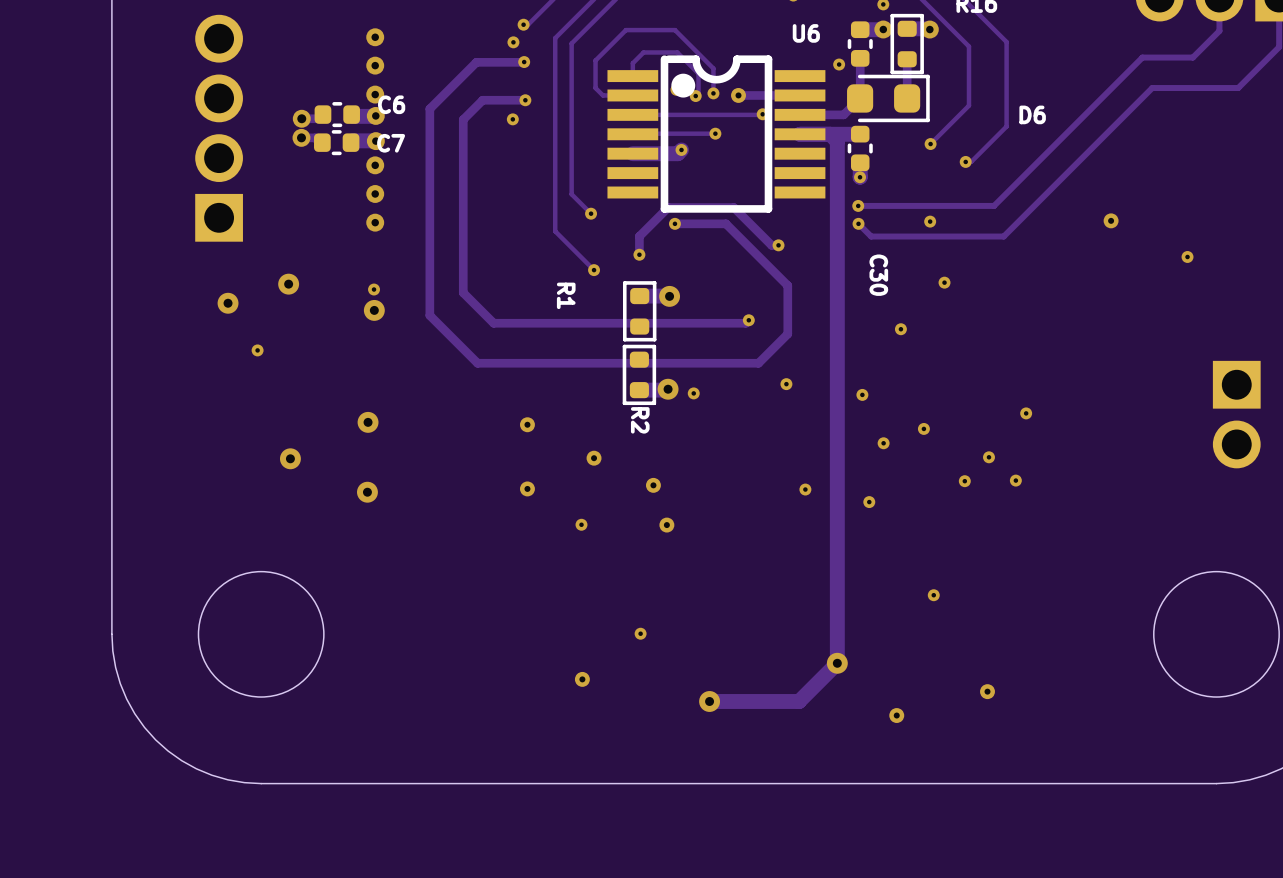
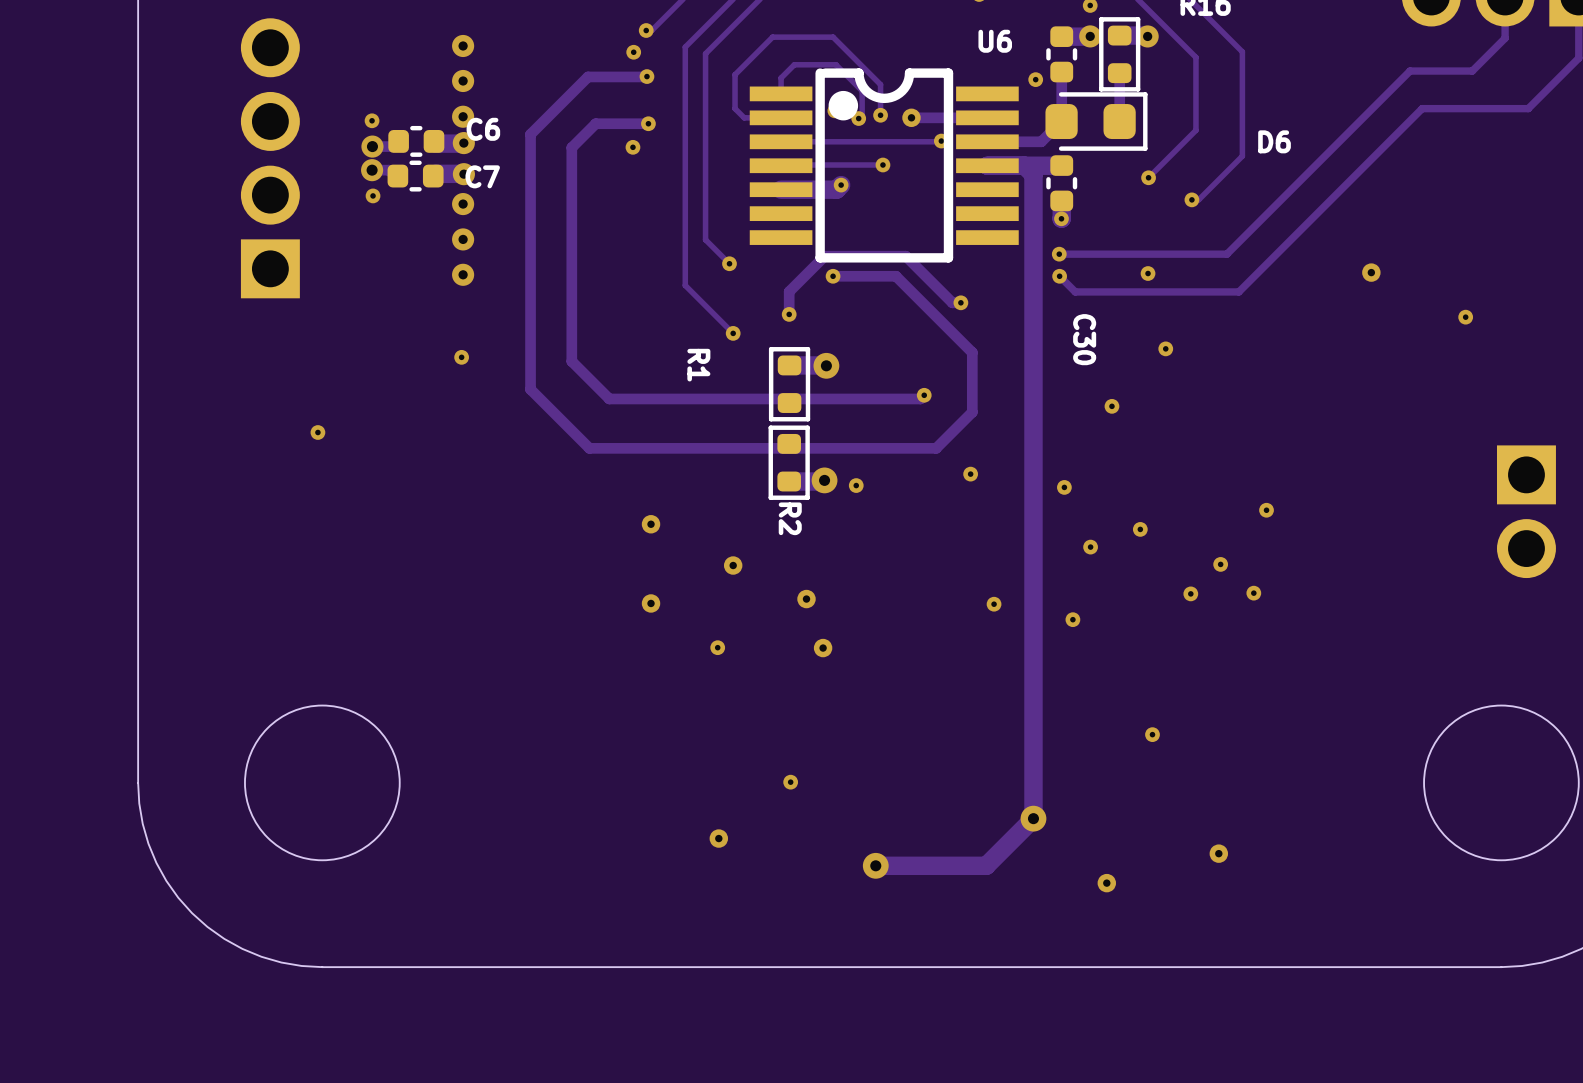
via: none -> (372, 120)
via: none -> (373, 195)
via: (288, 284) -> none
via: (228, 303) -> none
via: (374, 310) -> none
via: (368, 422) -> none
via: (290, 458) -> none
via: (367, 492) -> none

